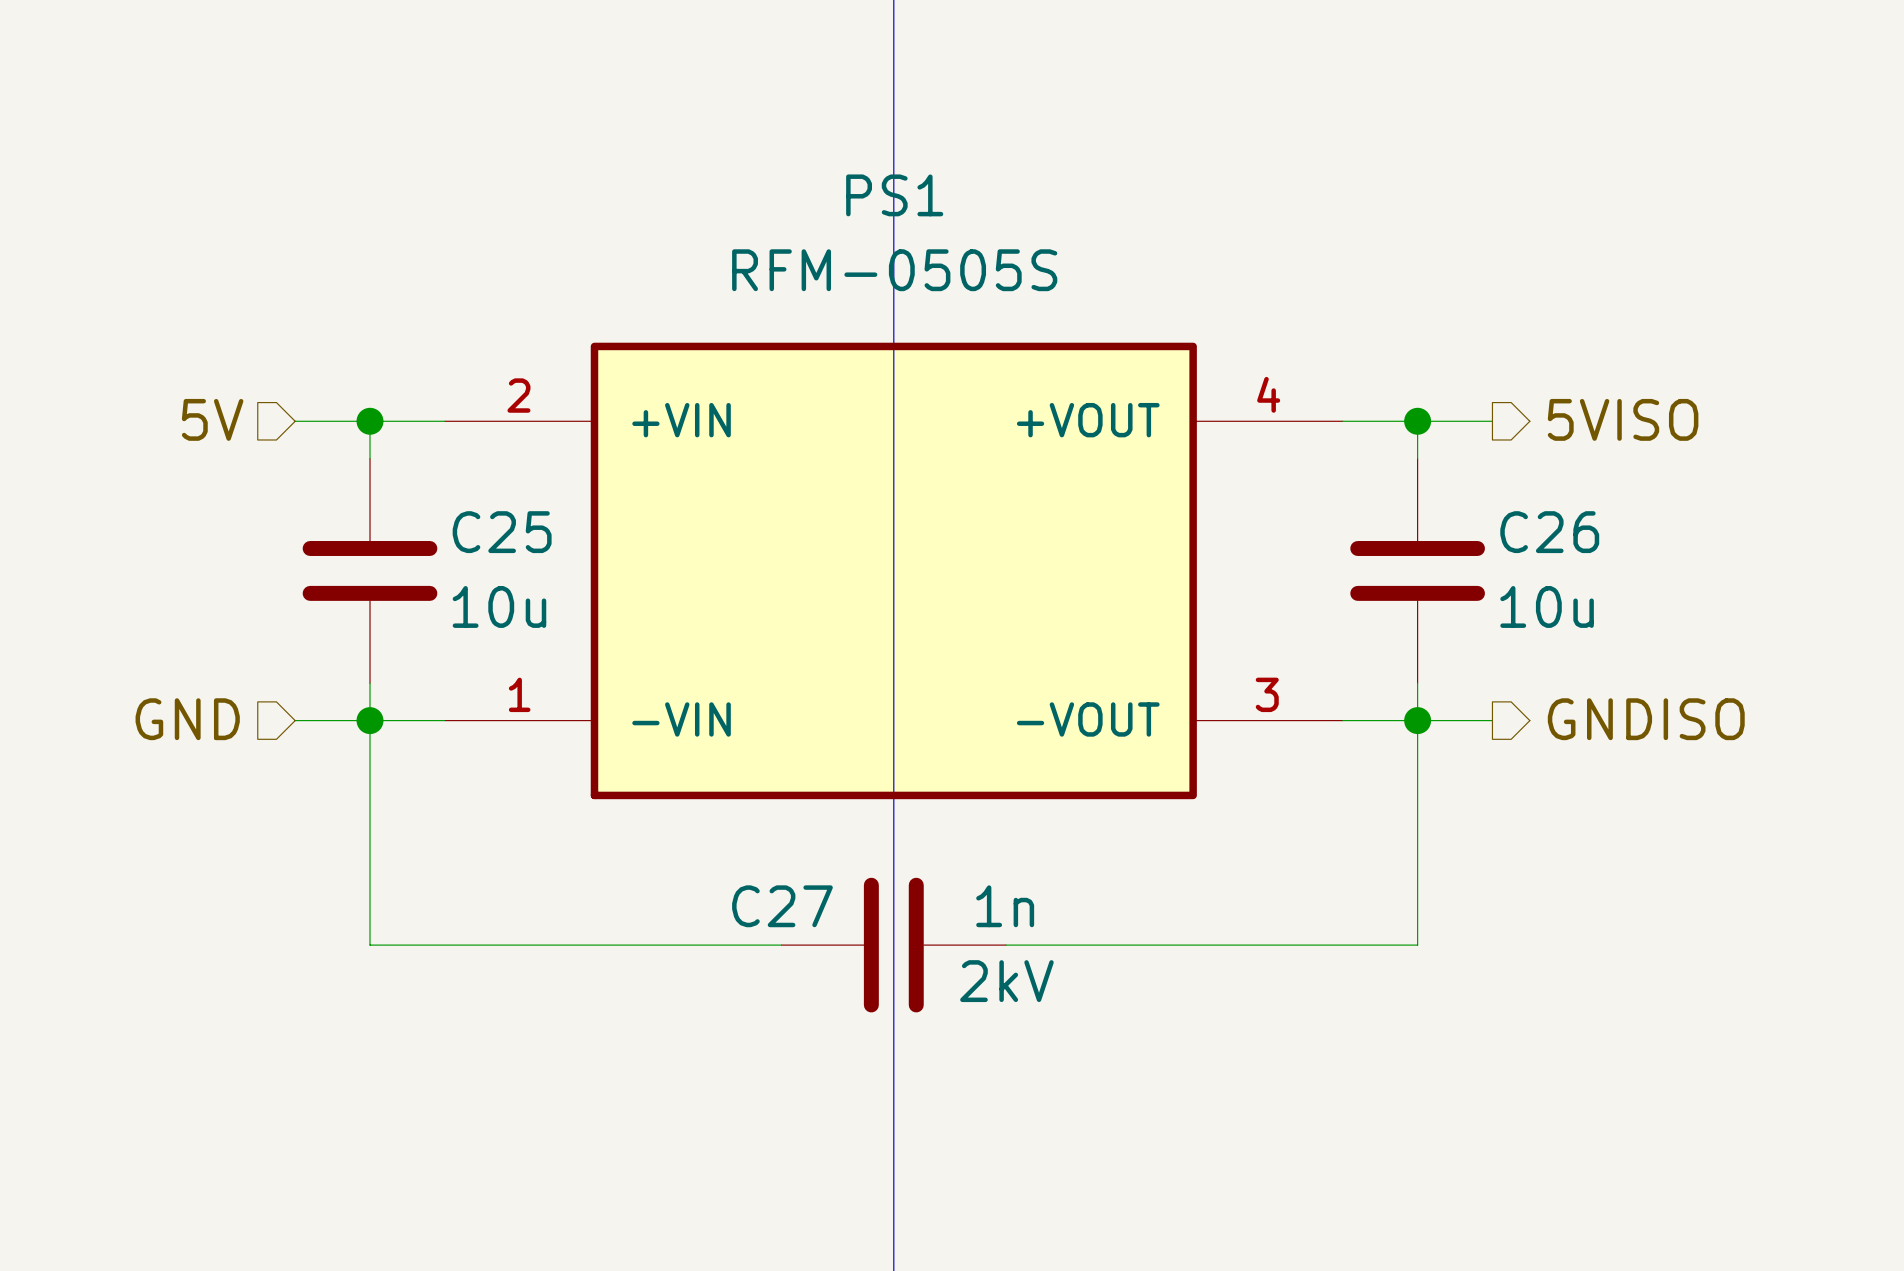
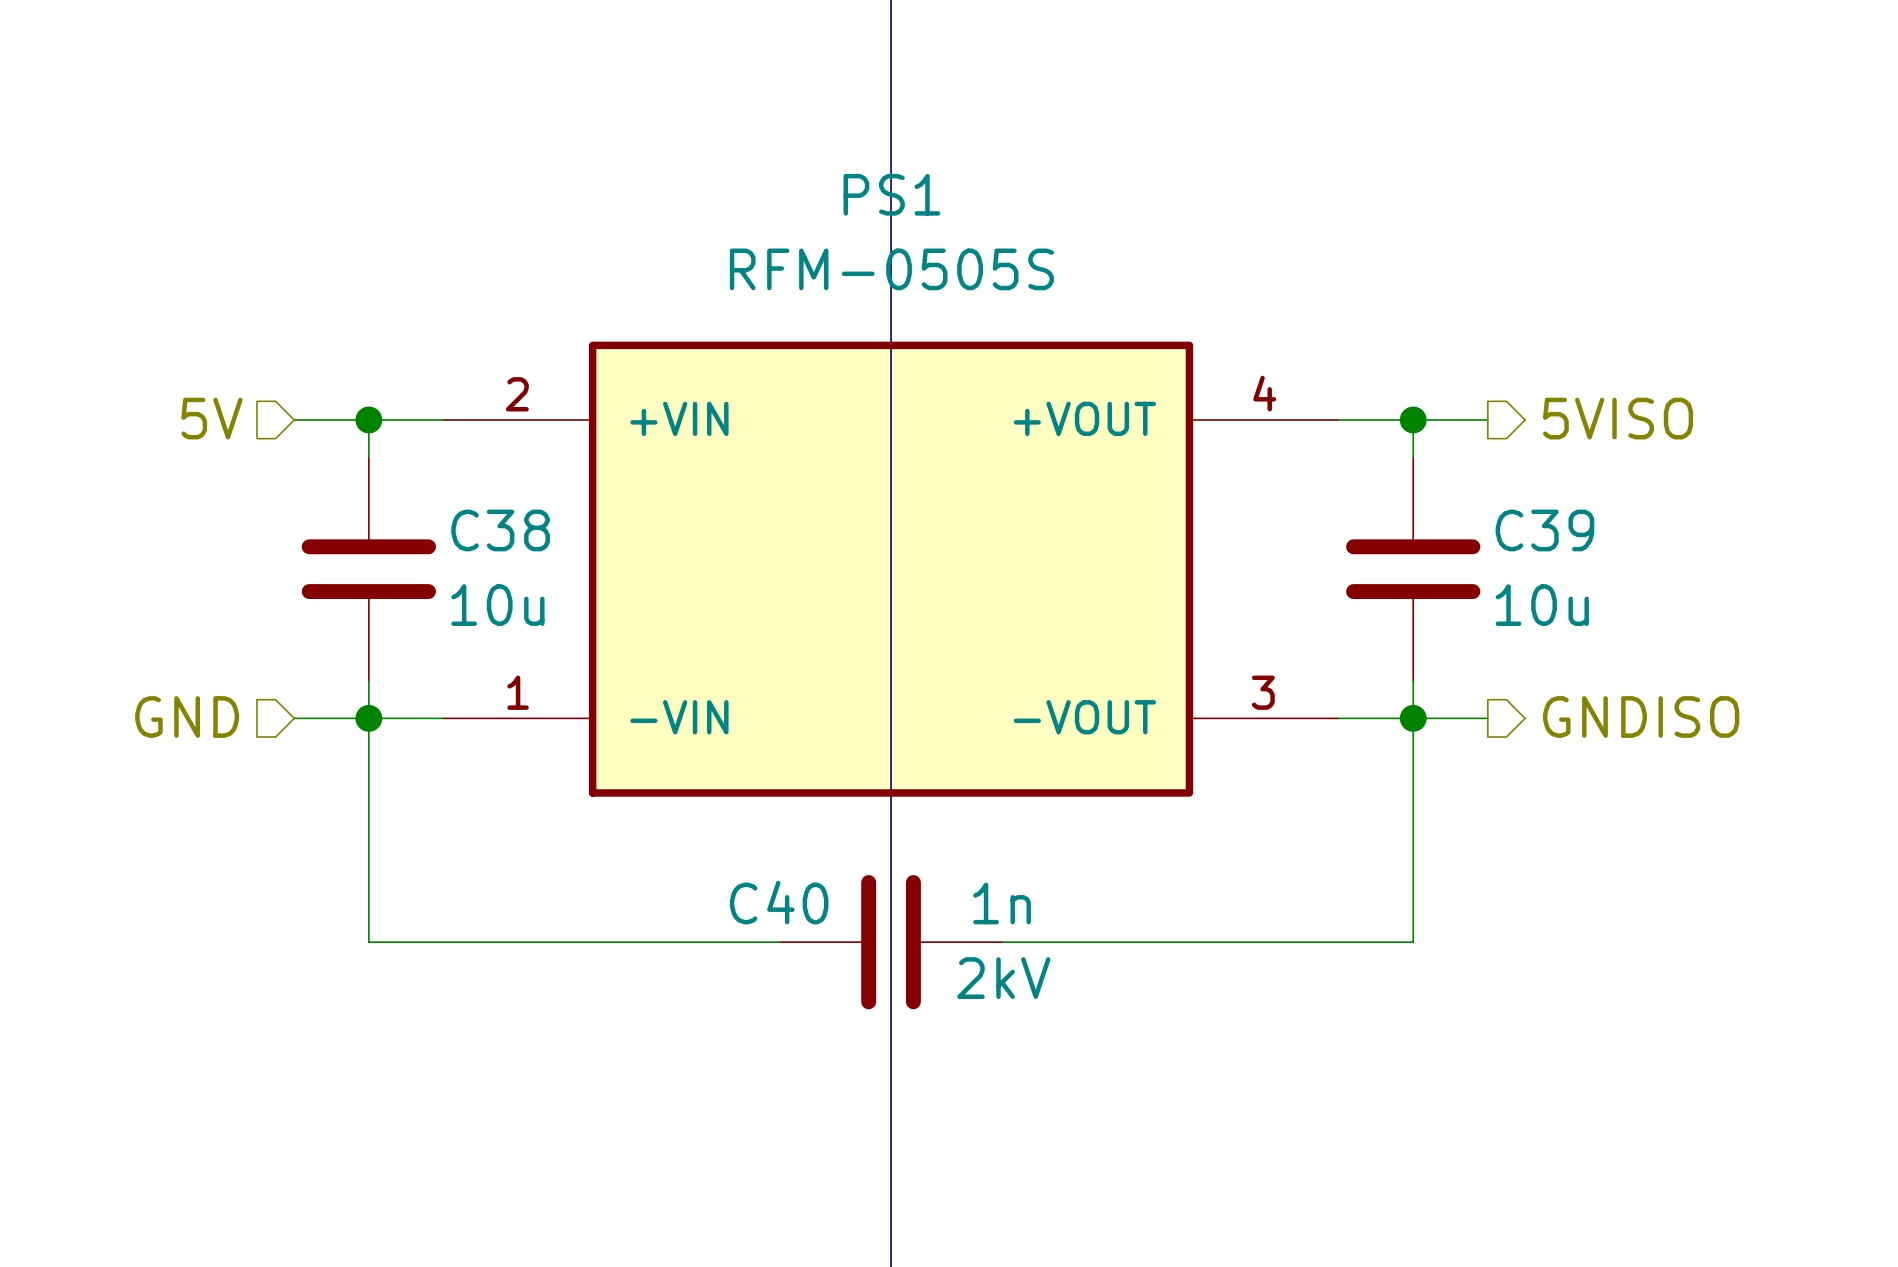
C25 name: C25 (502, 532) -> C38 (500, 530)
C26 name: C26 (1549, 532) -> C39 (1544, 530)
C27 name: C27 (782, 906) -> C40 (779, 902)

